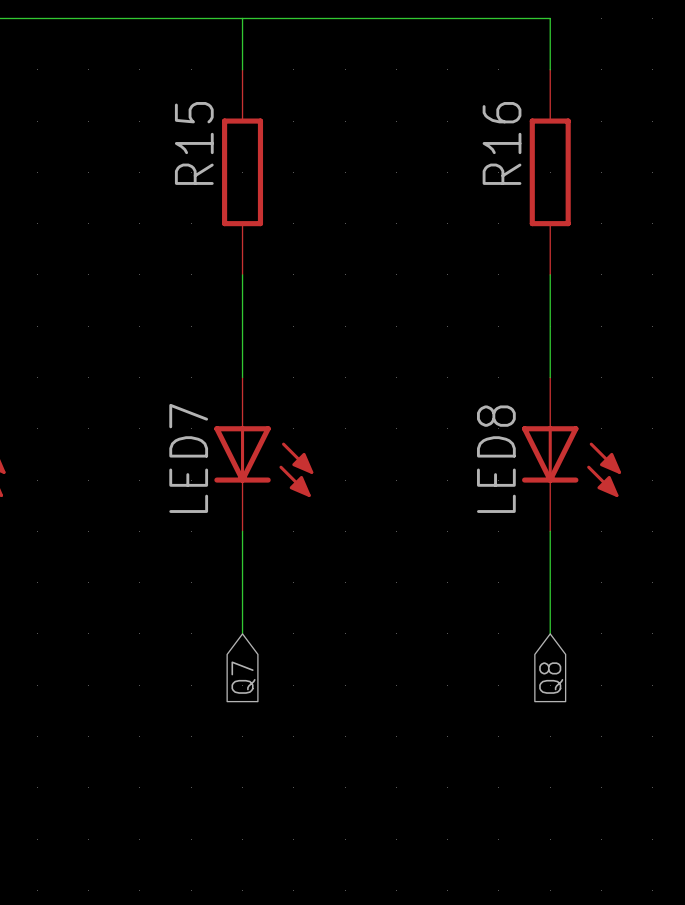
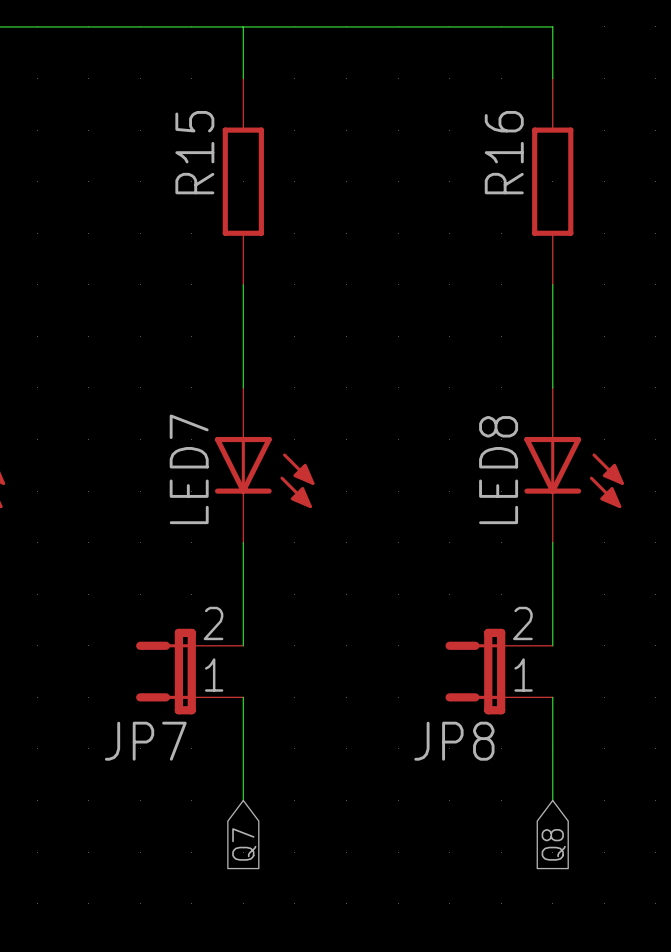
JP7: none -> (189, 671)
JP8: none -> (499, 671)
global label position: Q7 (243, 677) -> Q7 (244, 844)
global label position: Q8 (551, 678) -> Q8 (553, 844)
wire: none -> (243, 697) (243, 800)
wire: none -> (552, 697) (552, 800)

